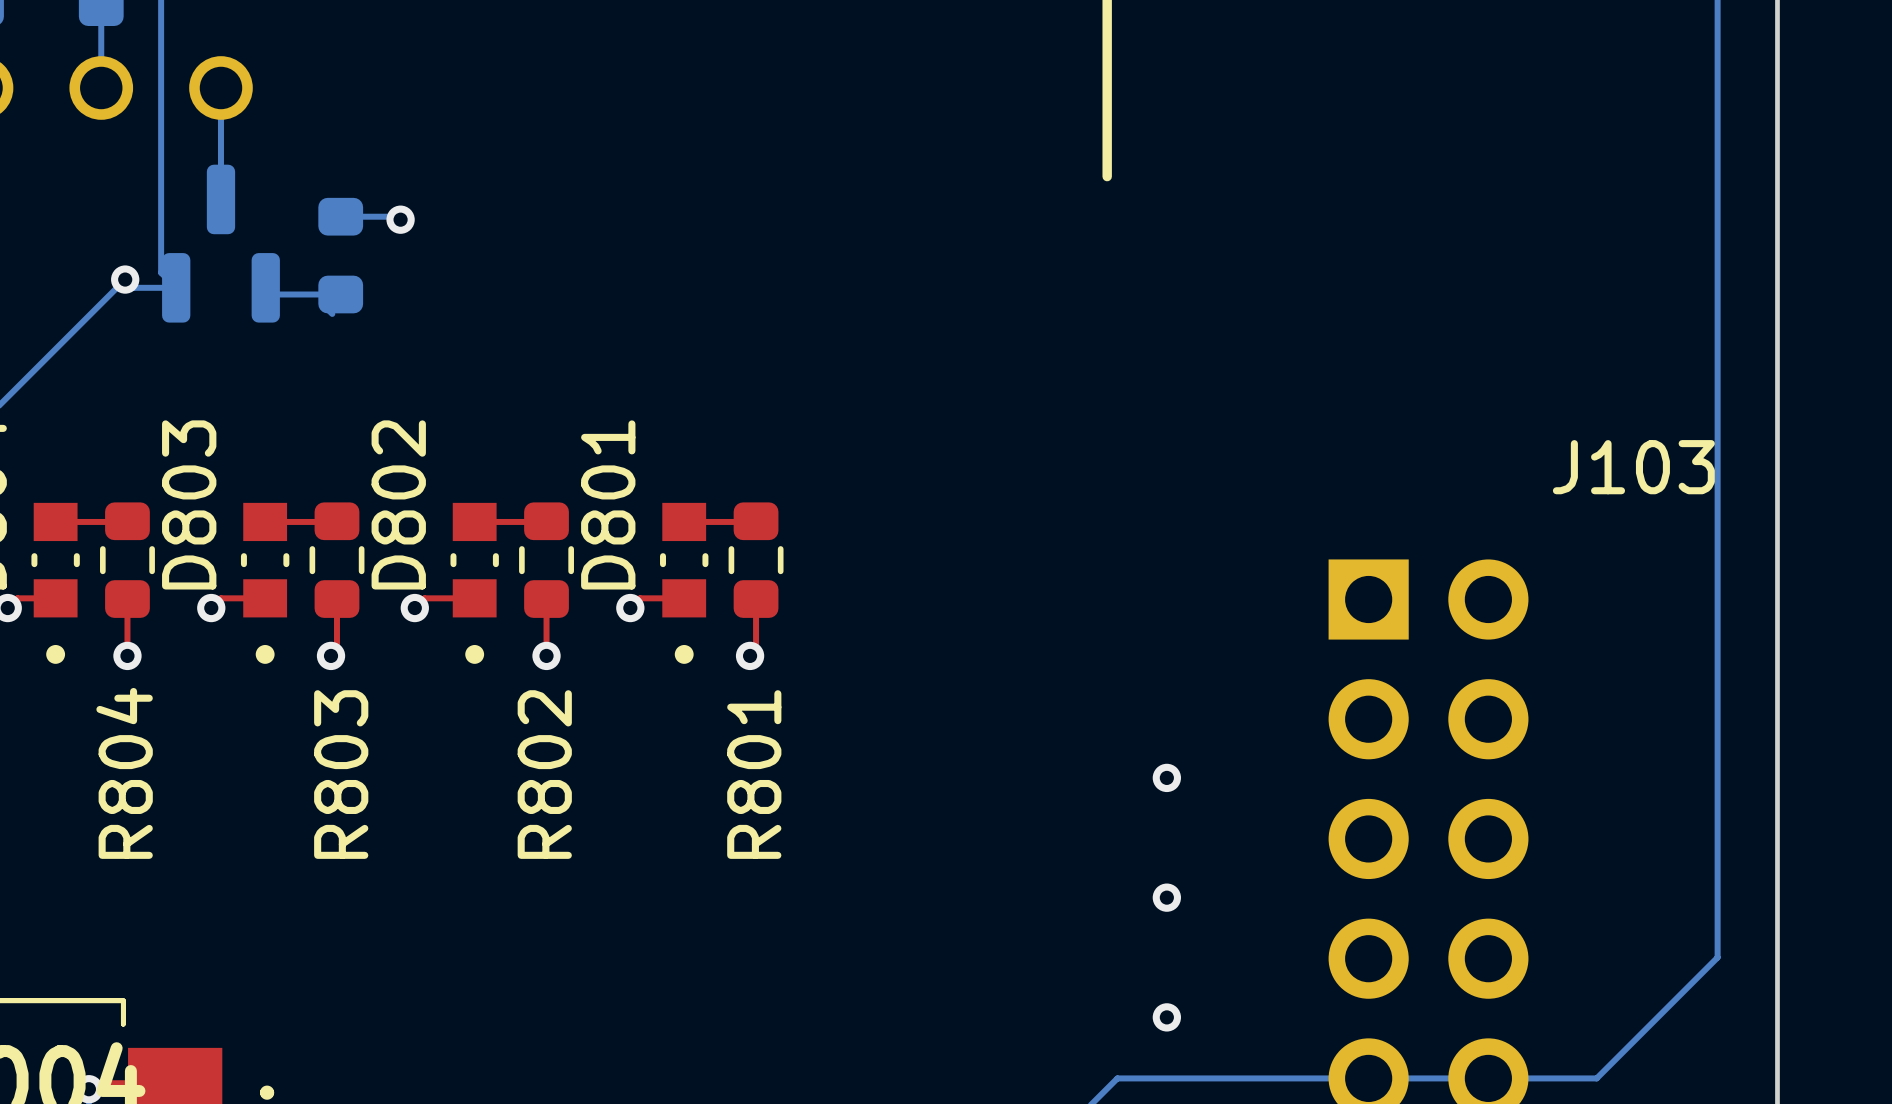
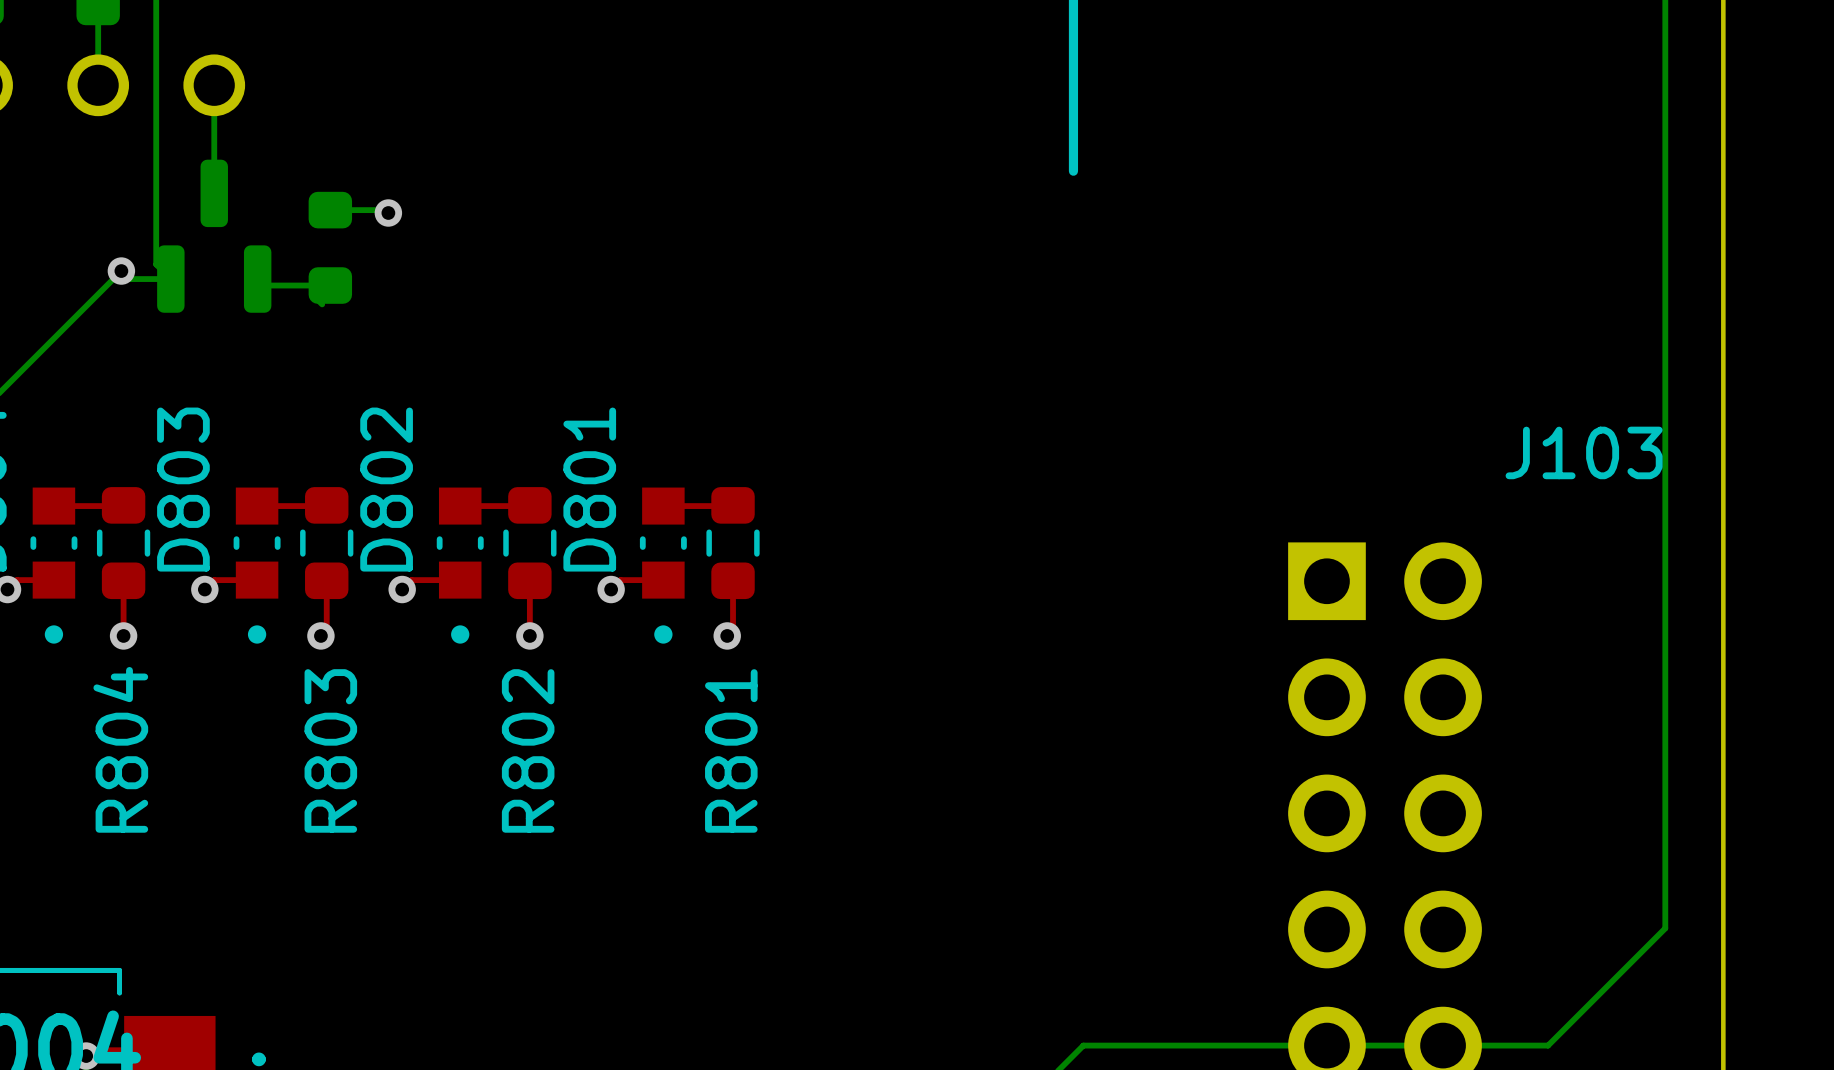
via: (1166, 777) -> none
via: (1166, 897) -> none
via: (1166, 1017) -> none

